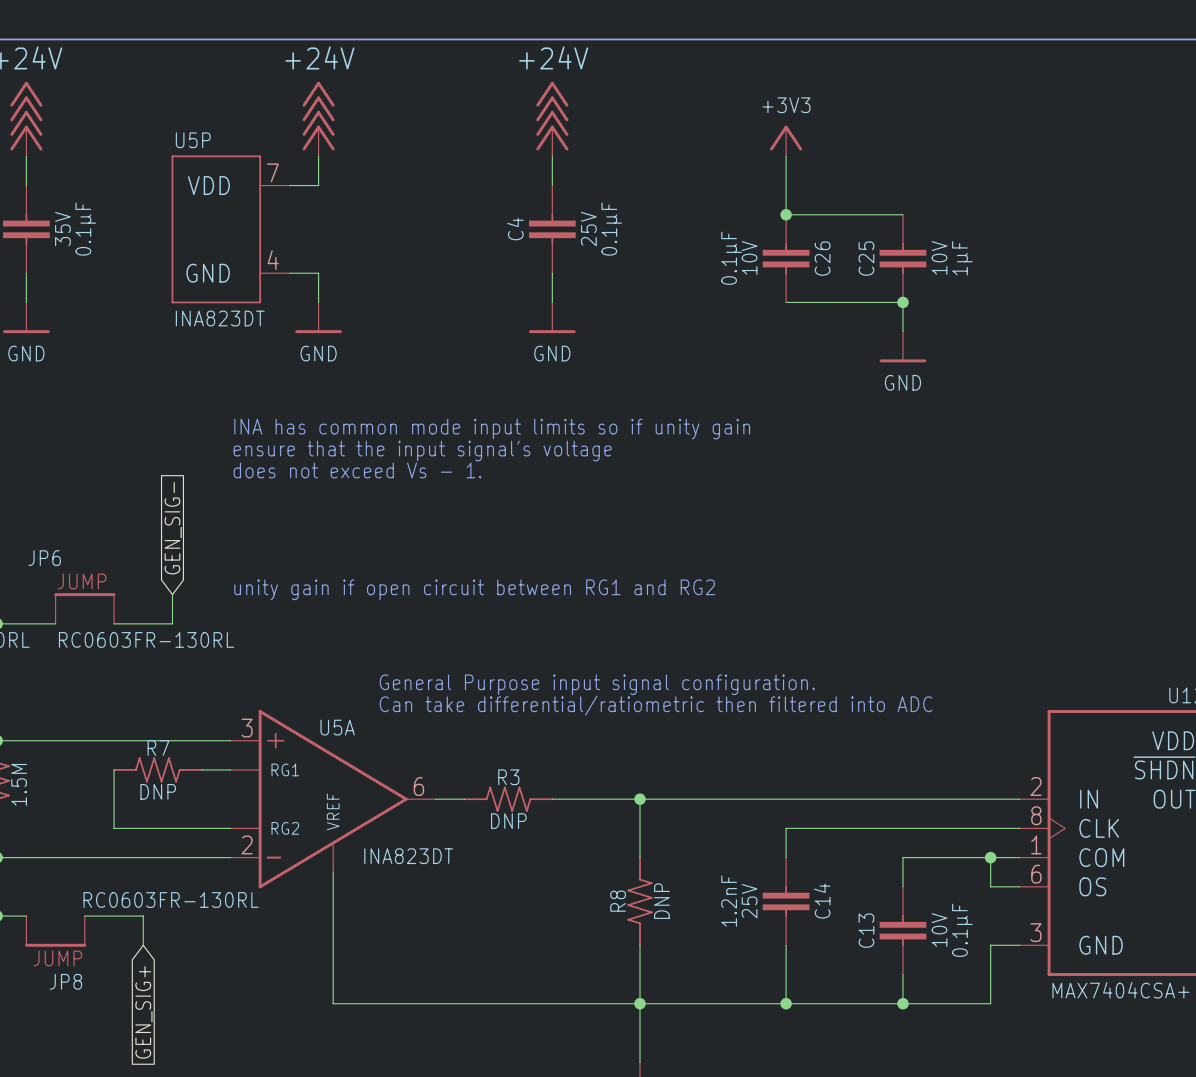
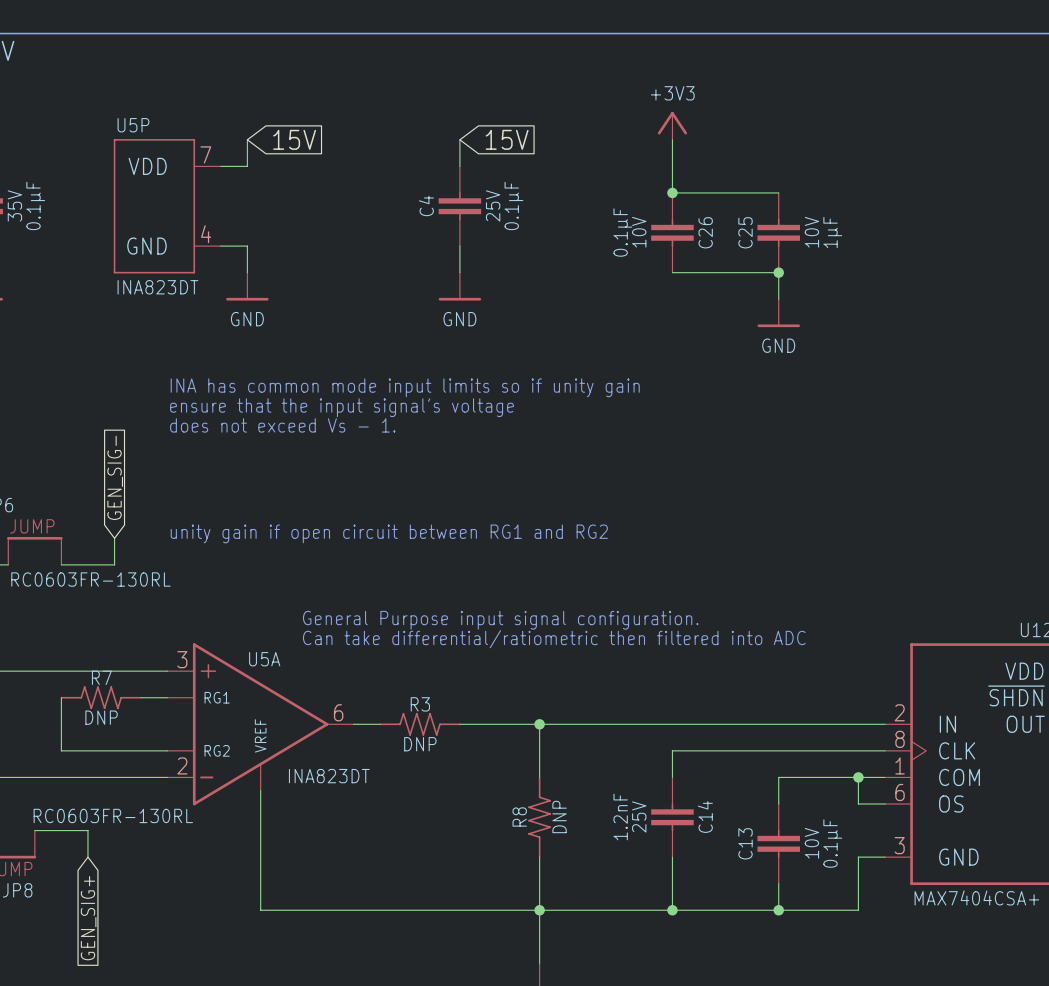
power symbol: +24V (318, 119) -> none
power symbol: +24V (552, 119) -> none
global label: none -> 15V (294, 139)
global label: none -> 15V (507, 139)

